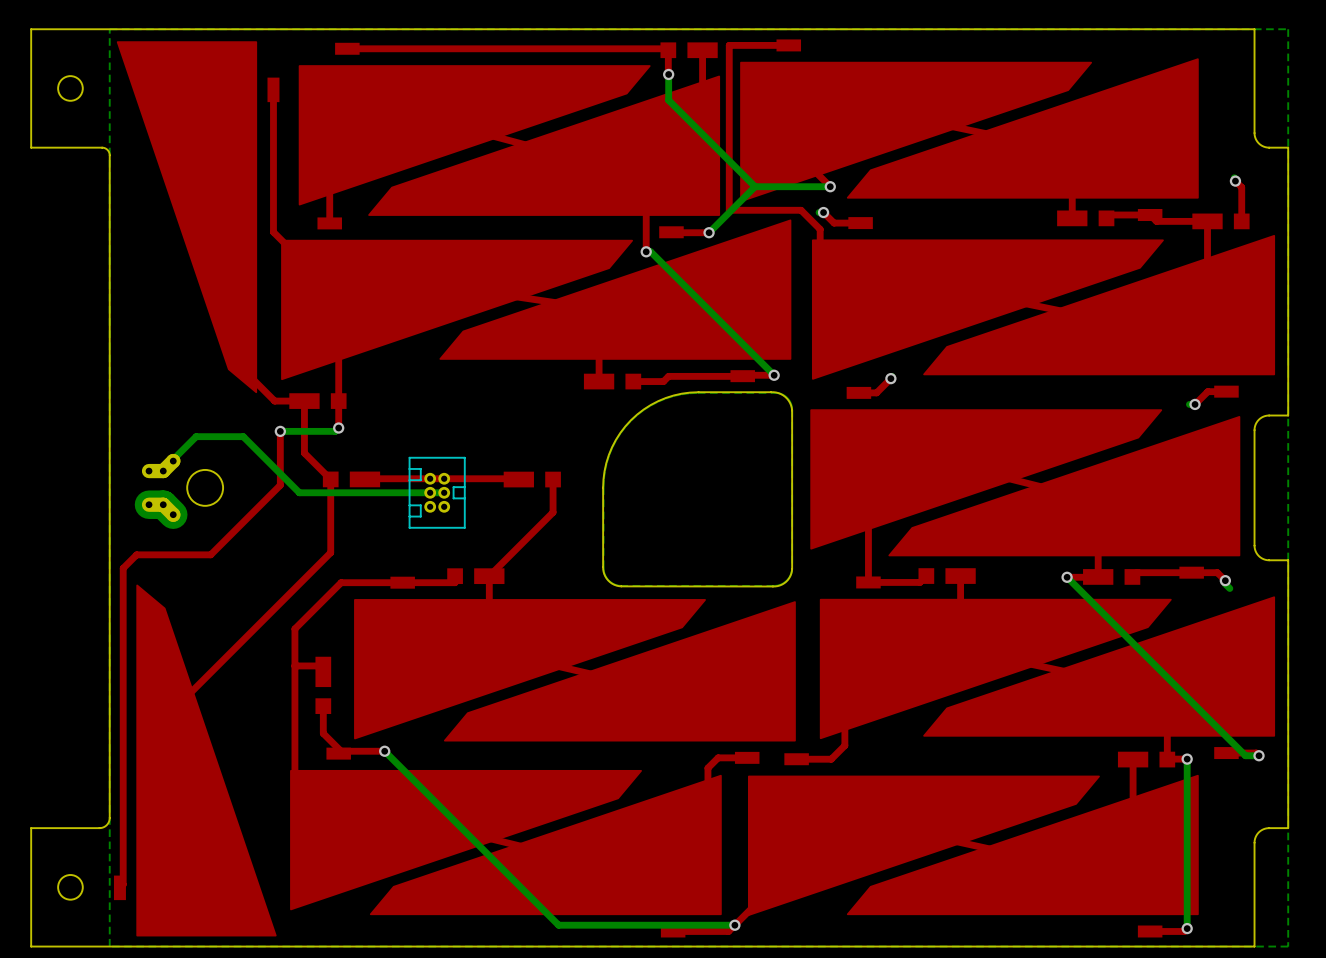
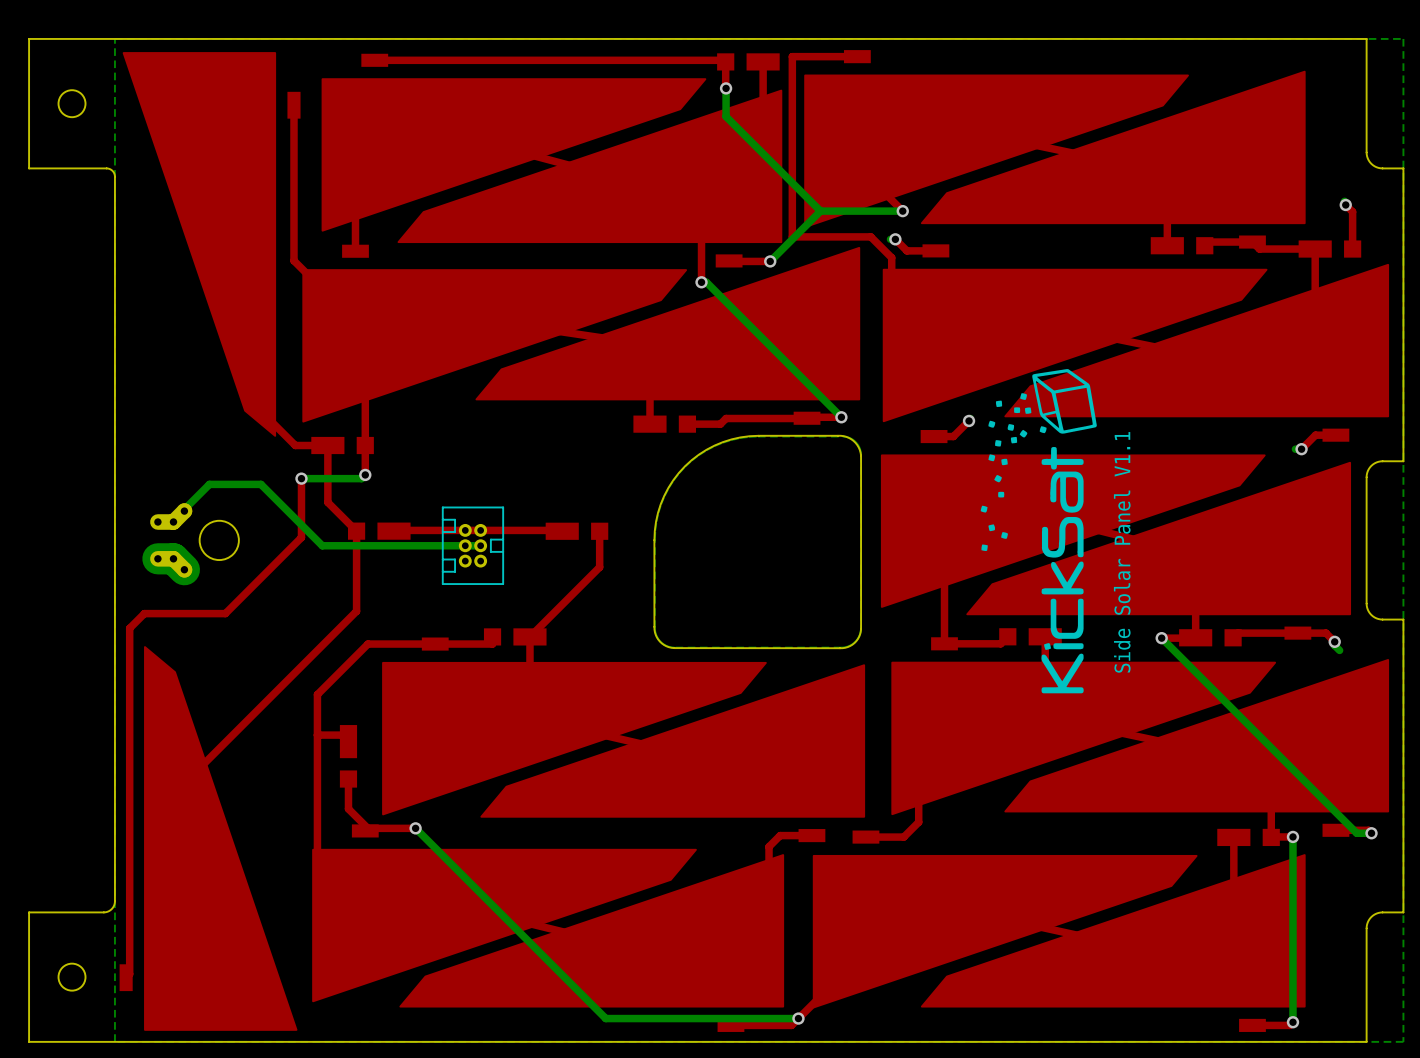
drawing: none -> [988, 369, 1097, 498]
drawing: none -> [1041, 446, 1084, 694]
drawing: none -> [980, 505, 1008, 551]
text: none -> Side Solar Panel V1.1 (1122, 552)

